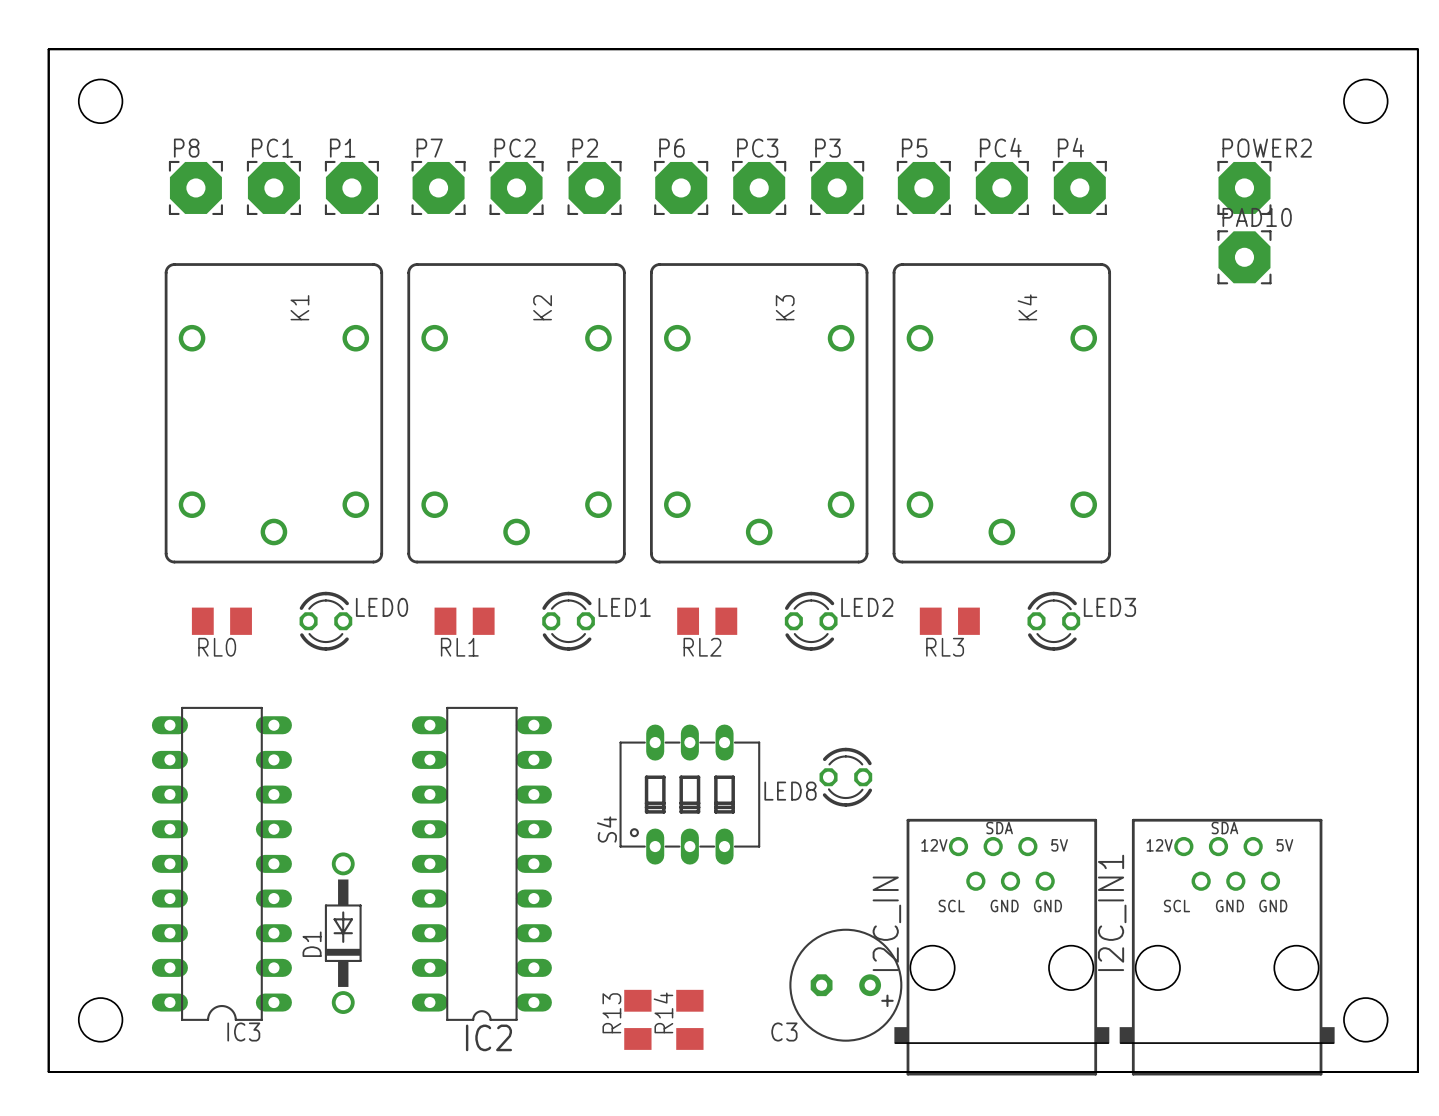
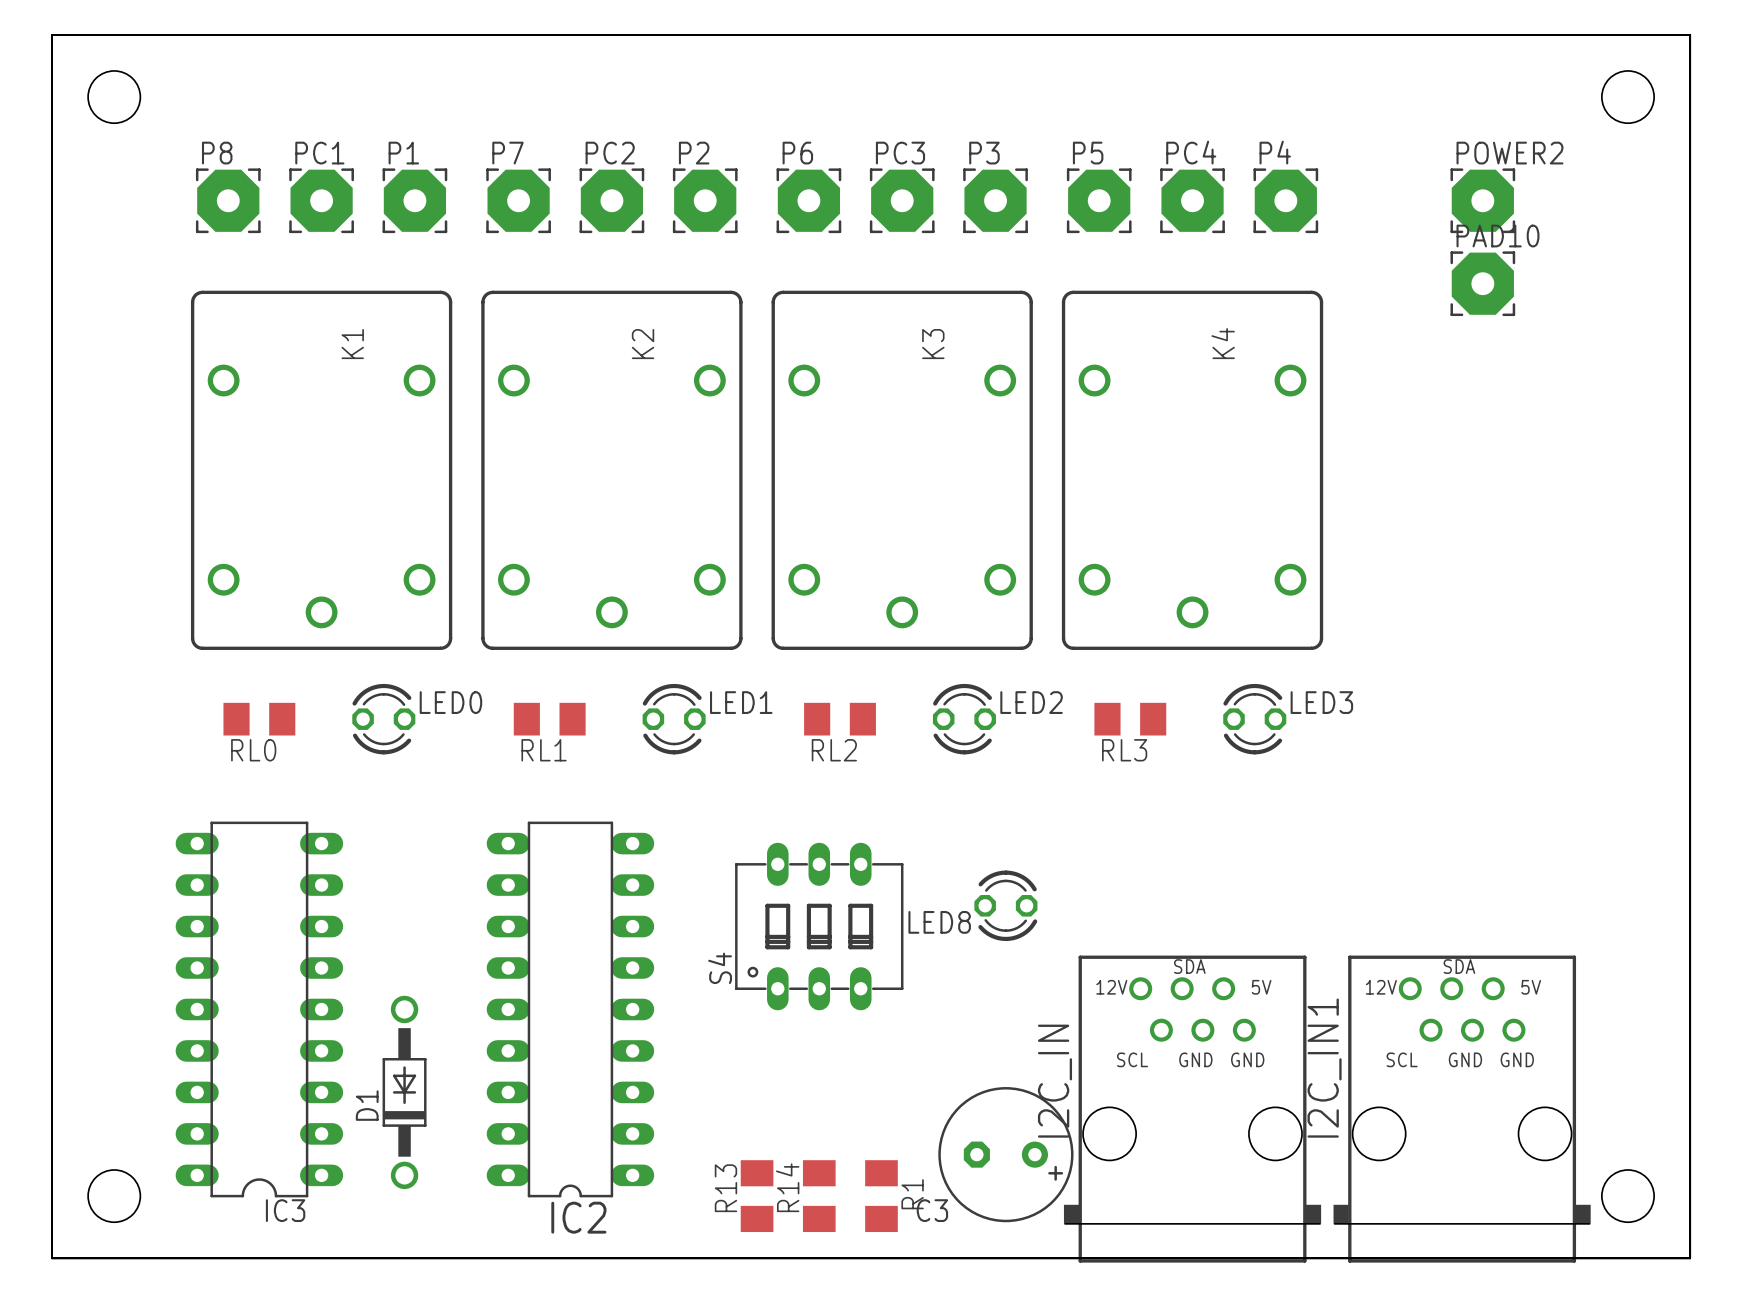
R1: none -> (881, 1196)

